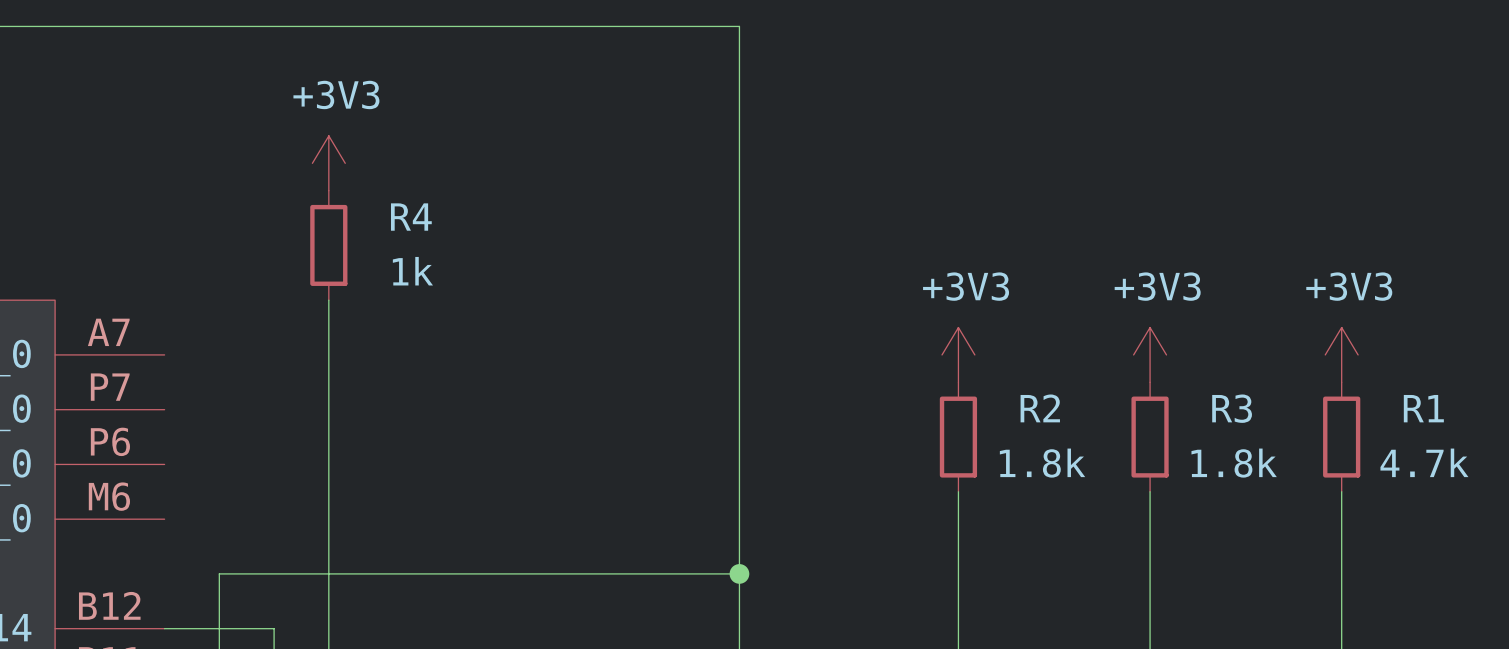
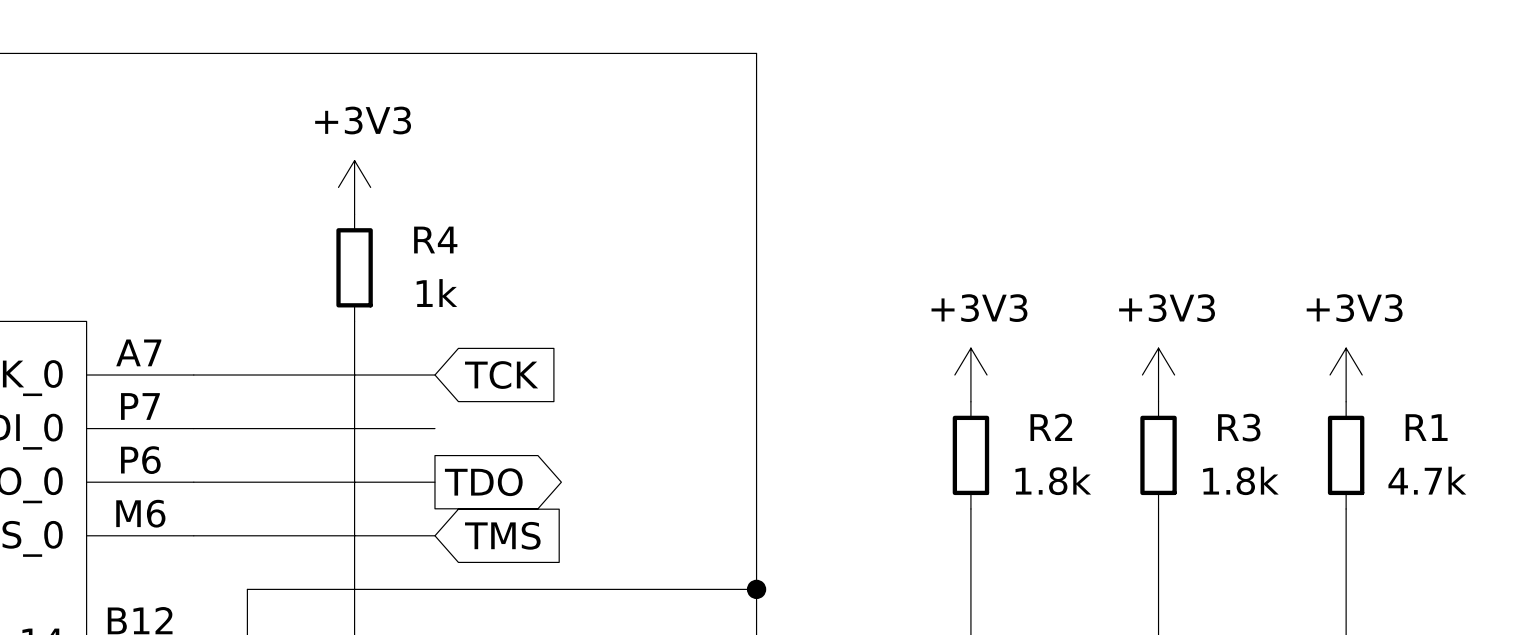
wire: none -> (193, 375) (434, 375)
global label: none -> TCK (501, 375)
wire: none -> (193, 428) (434, 428)
wire: none -> (193, 482) (434, 482)
global label: none -> TDO (483, 482)
wire: none -> (193, 535) (434, 535)
global label: none -> TMS (502, 535)

